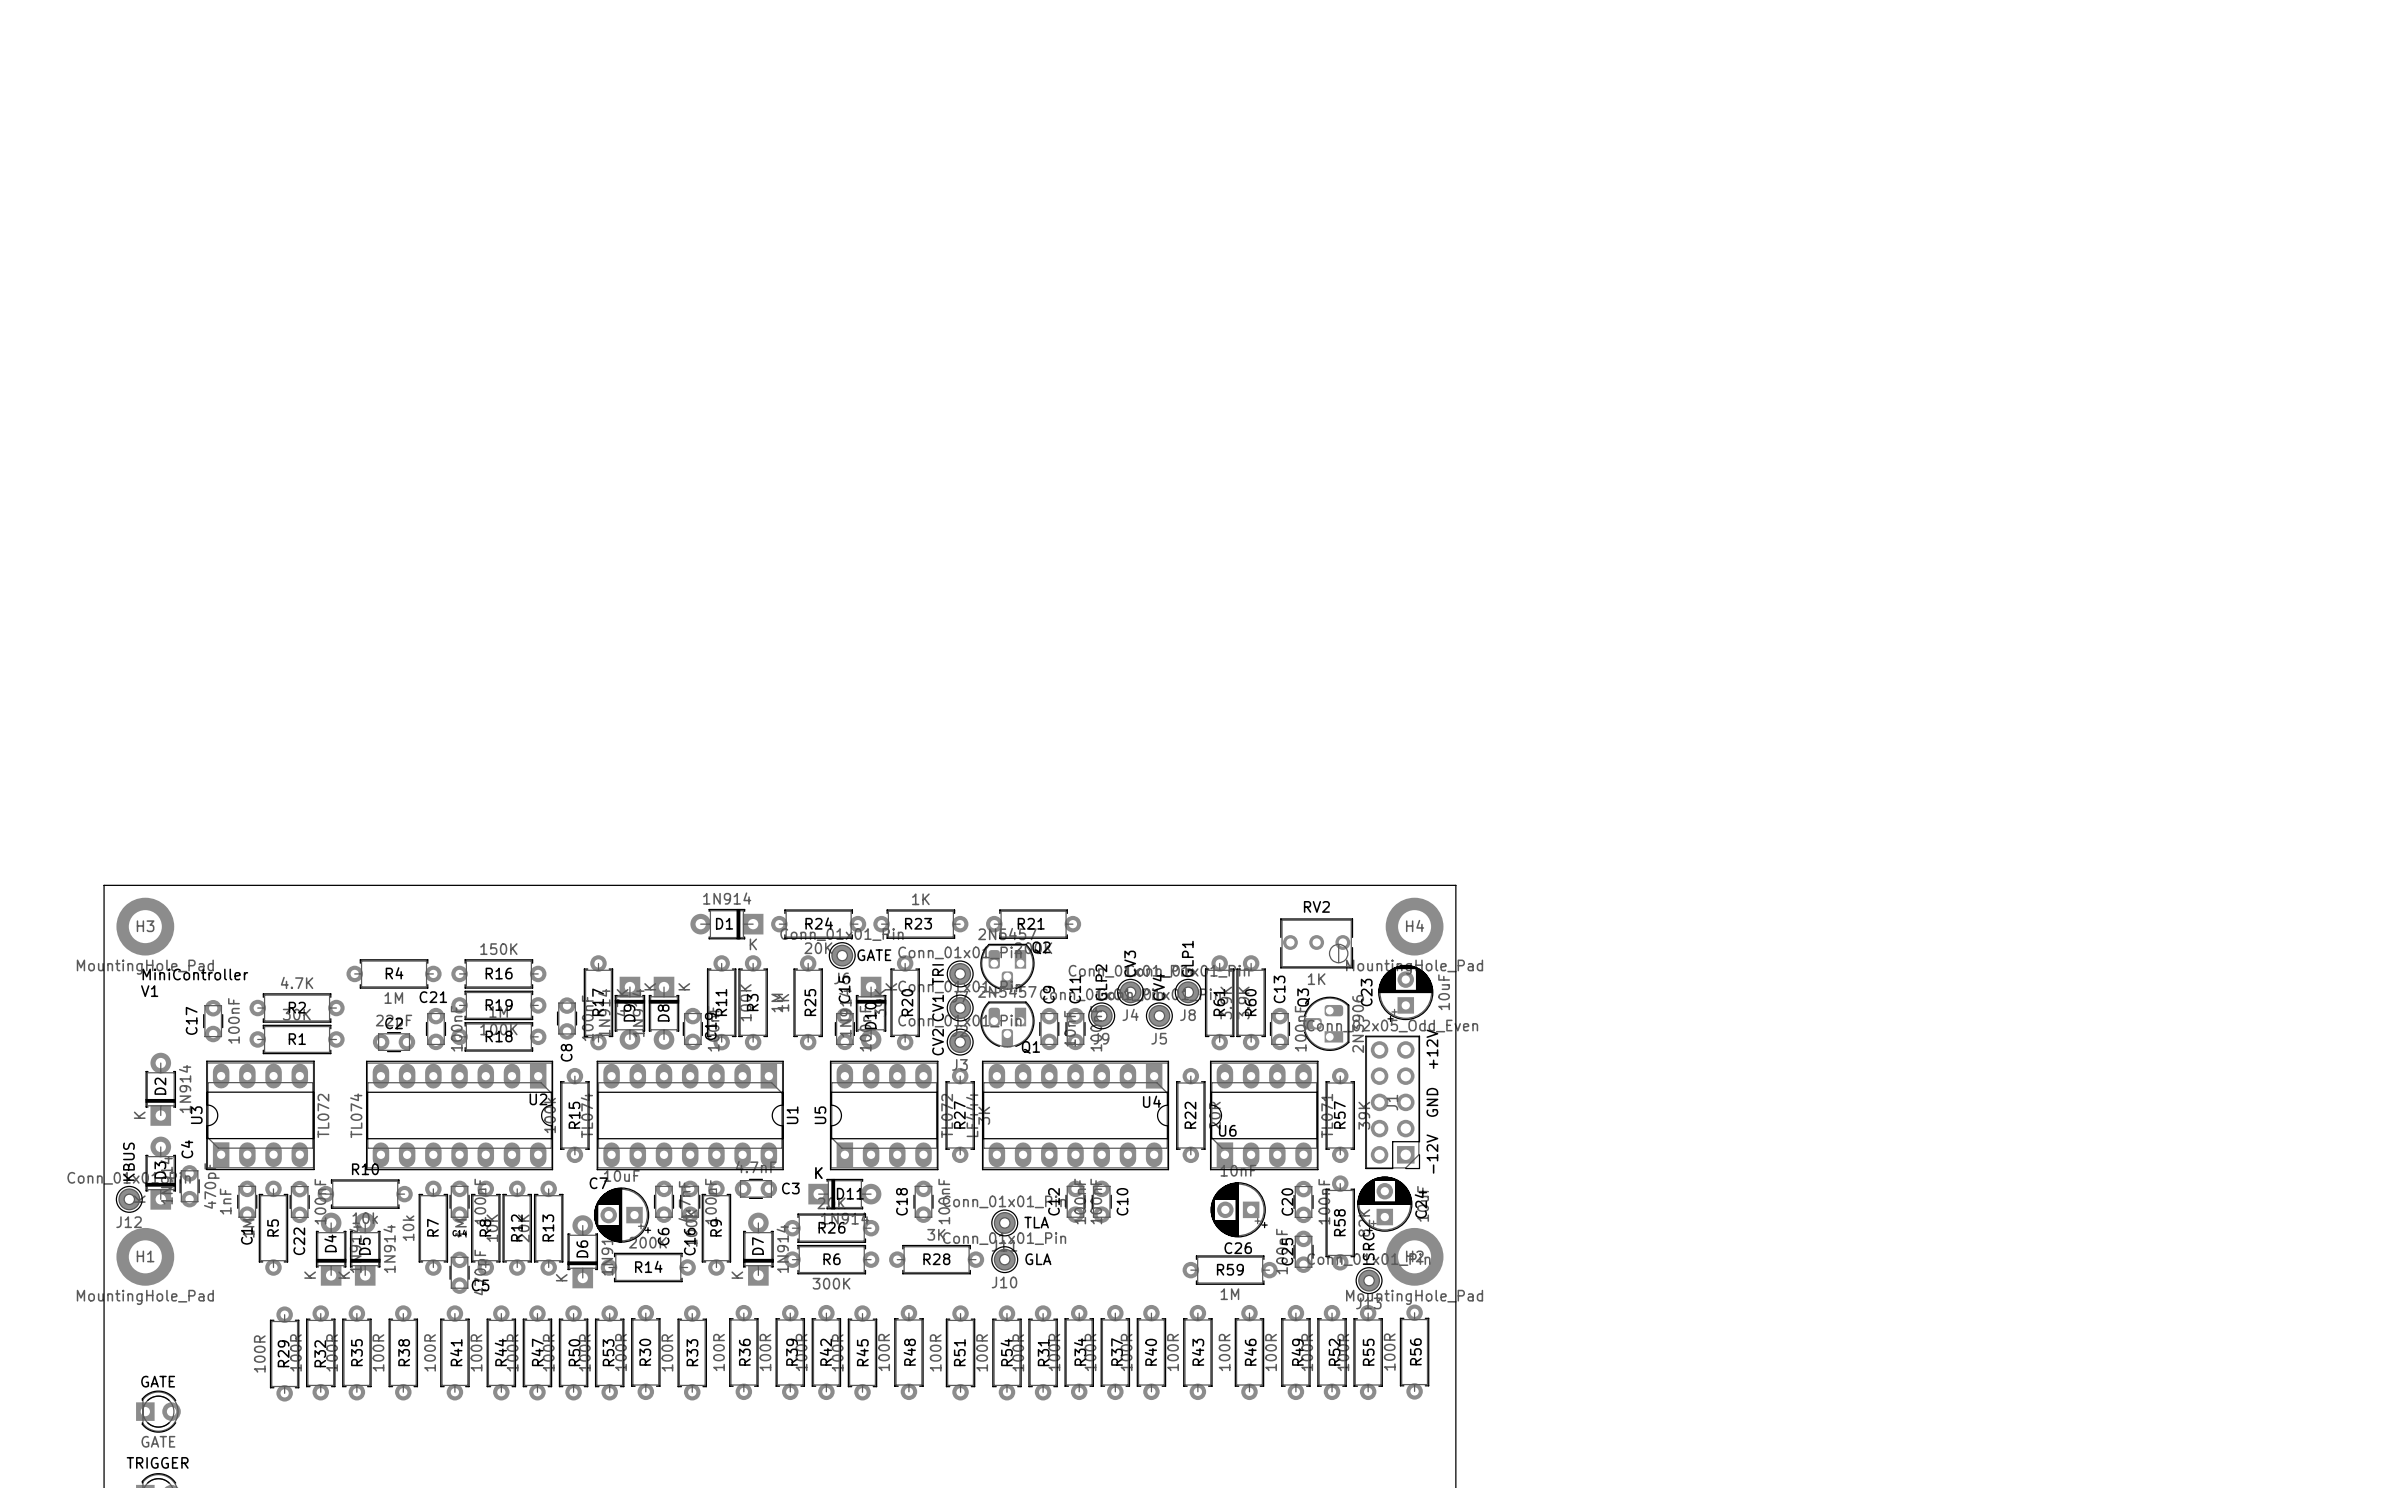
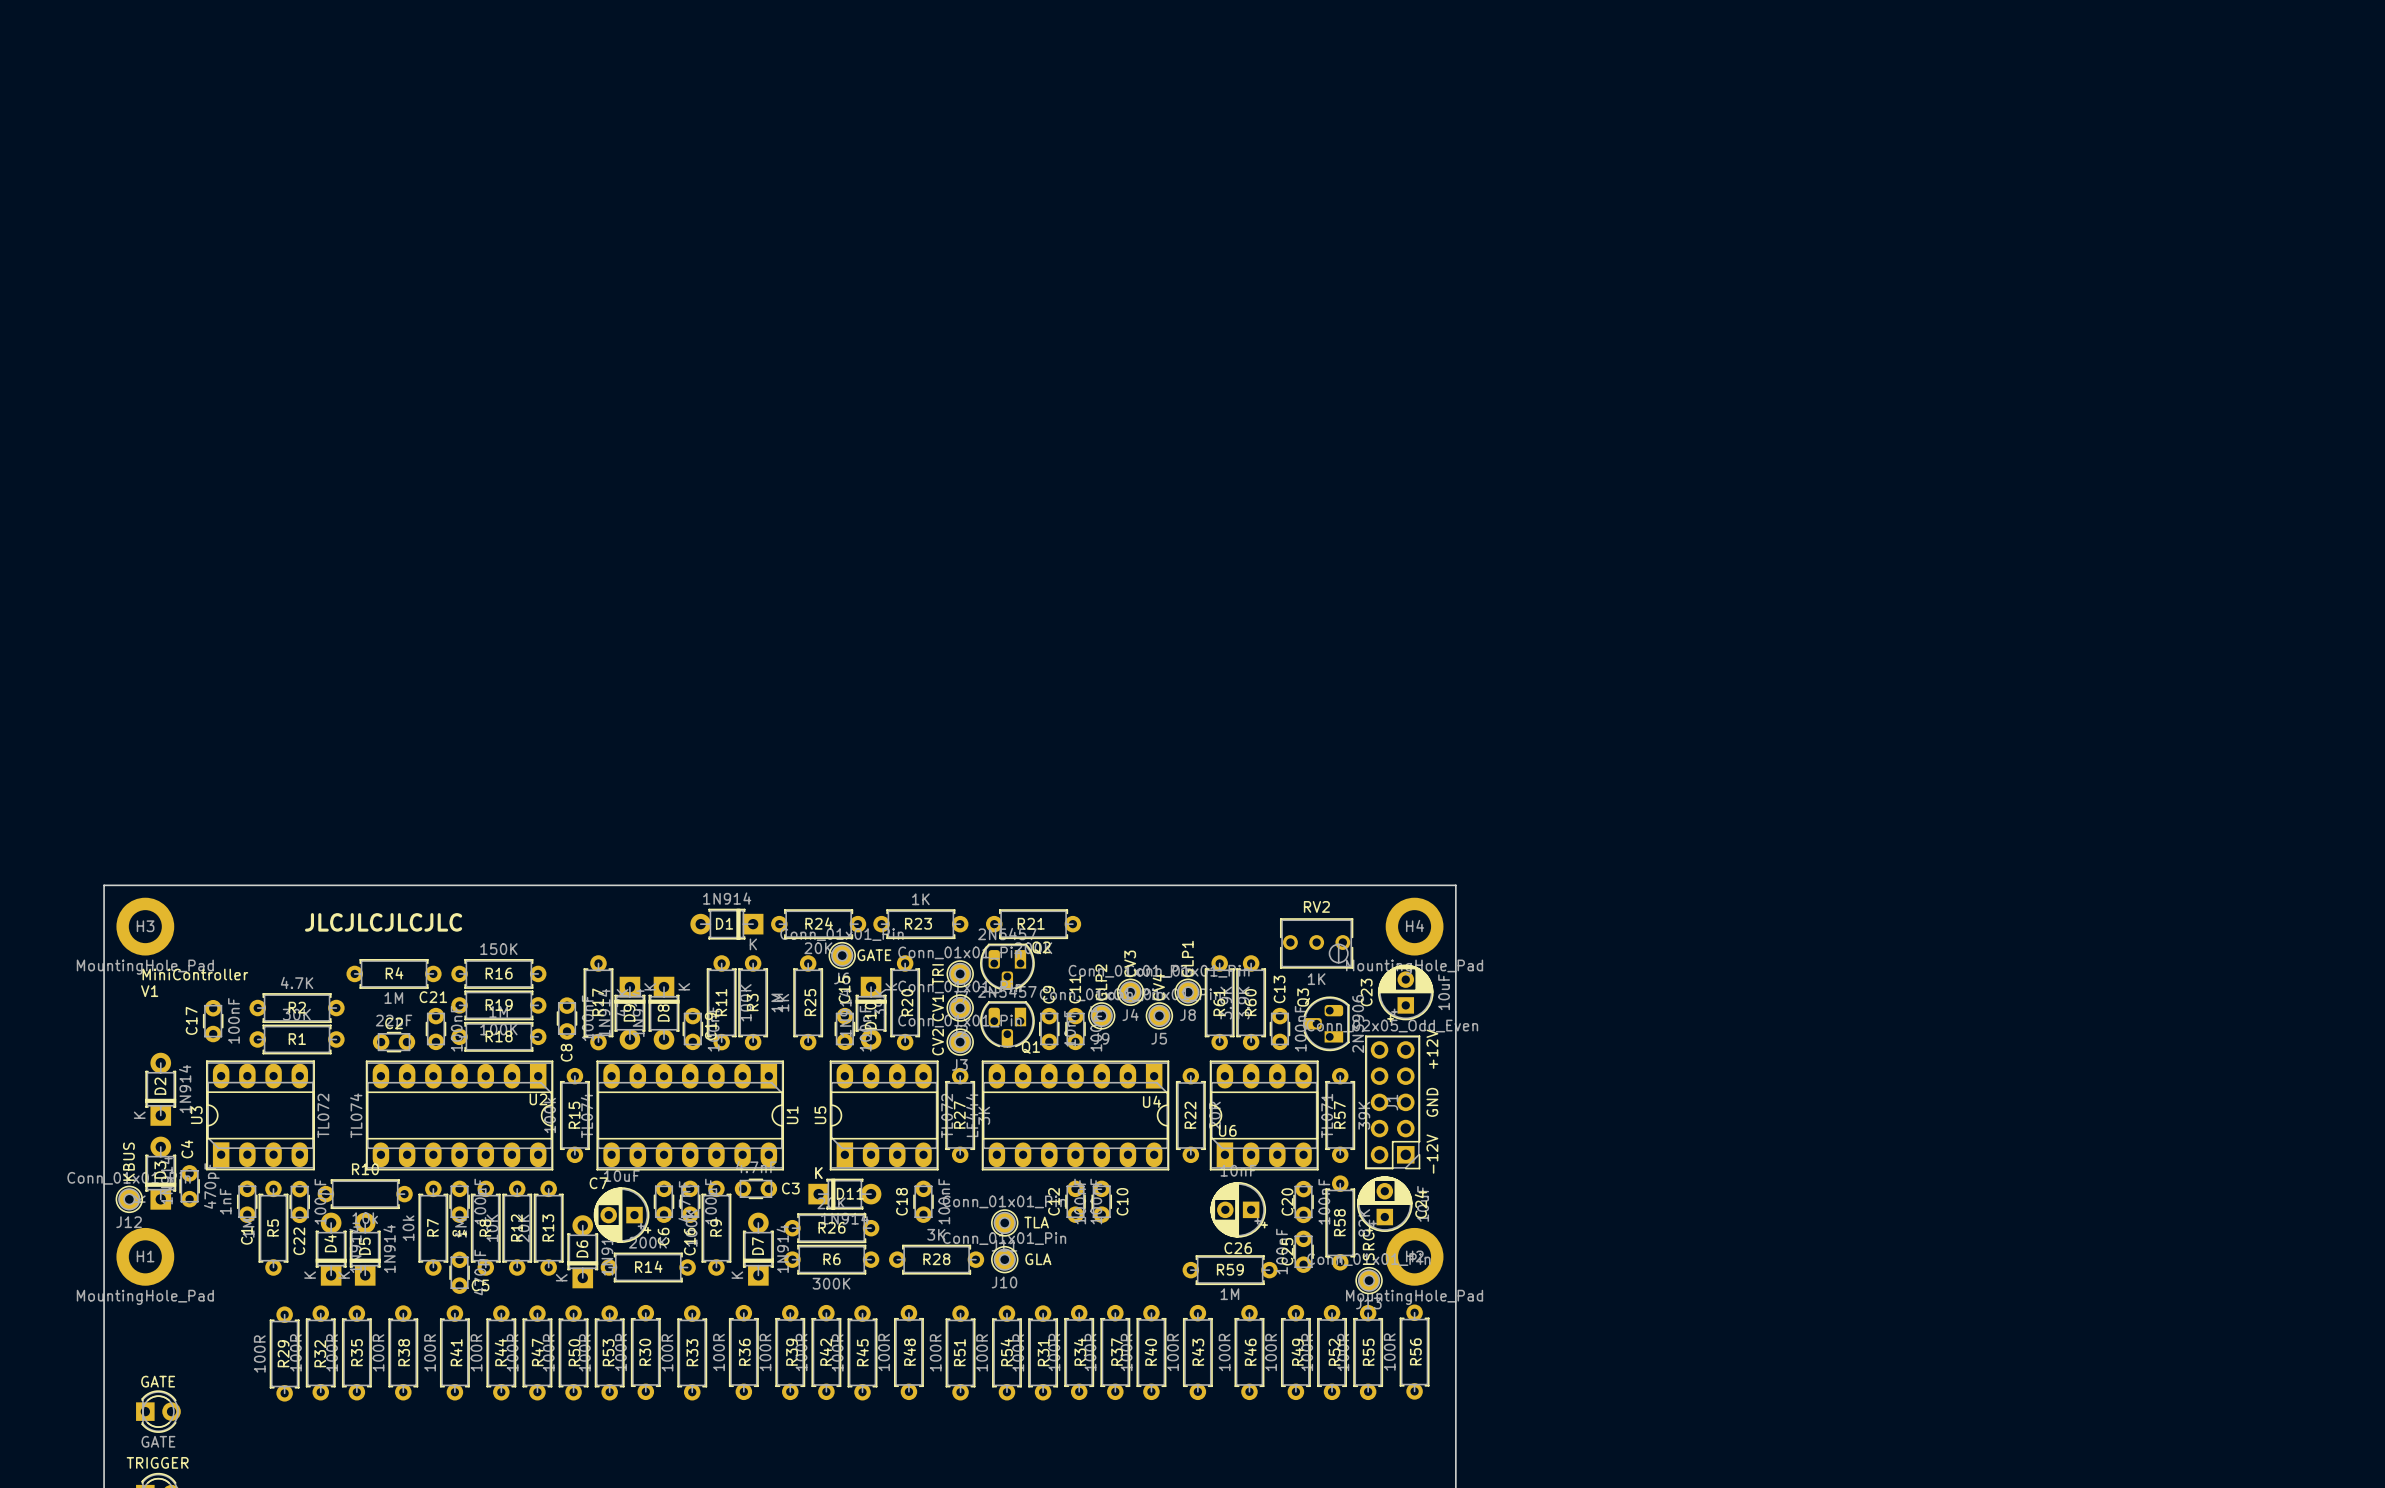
text: none -> JLCJLCJLCJLC (383, 922)

